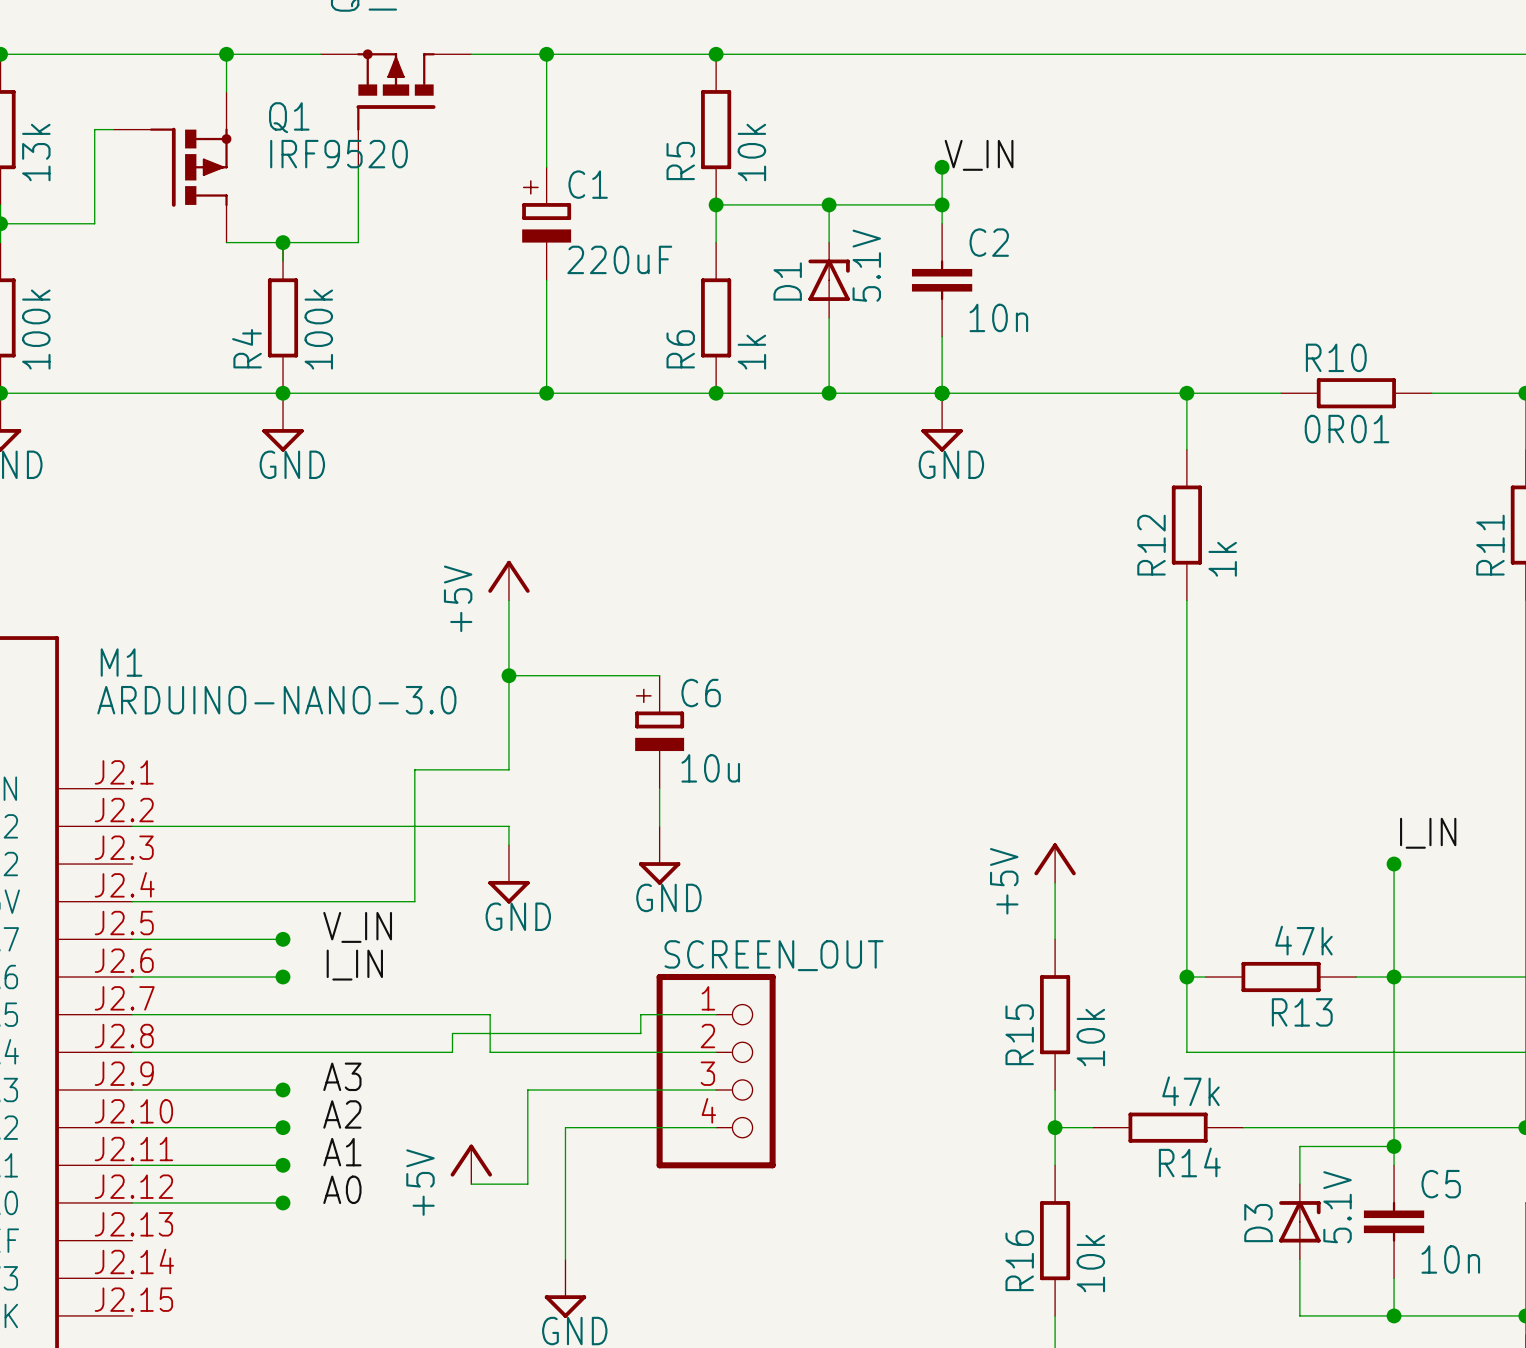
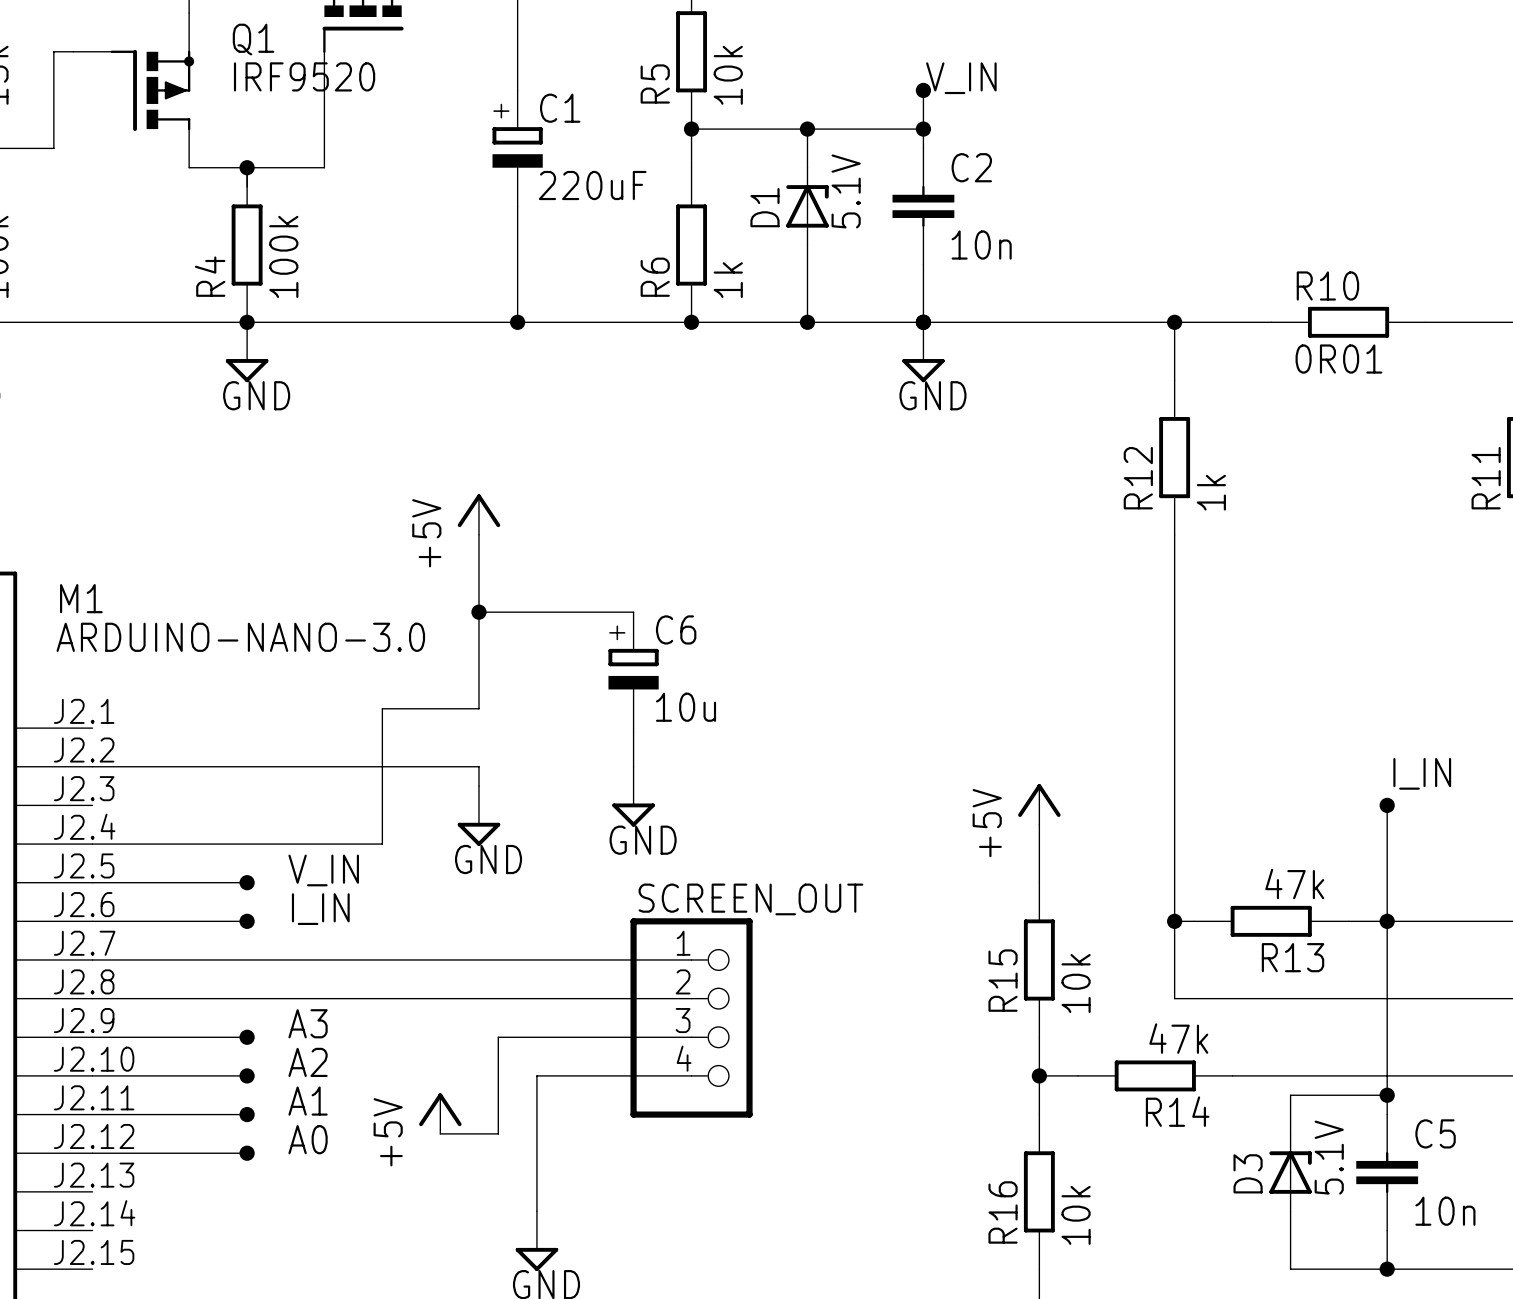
wire: (490, 1014) (490, 1052) -> (421, 998) (459, 998)
wire: (640, 1014) (640, 1033) (452, 1033) (452, 1052) -> (614, 959) (459, 959)

